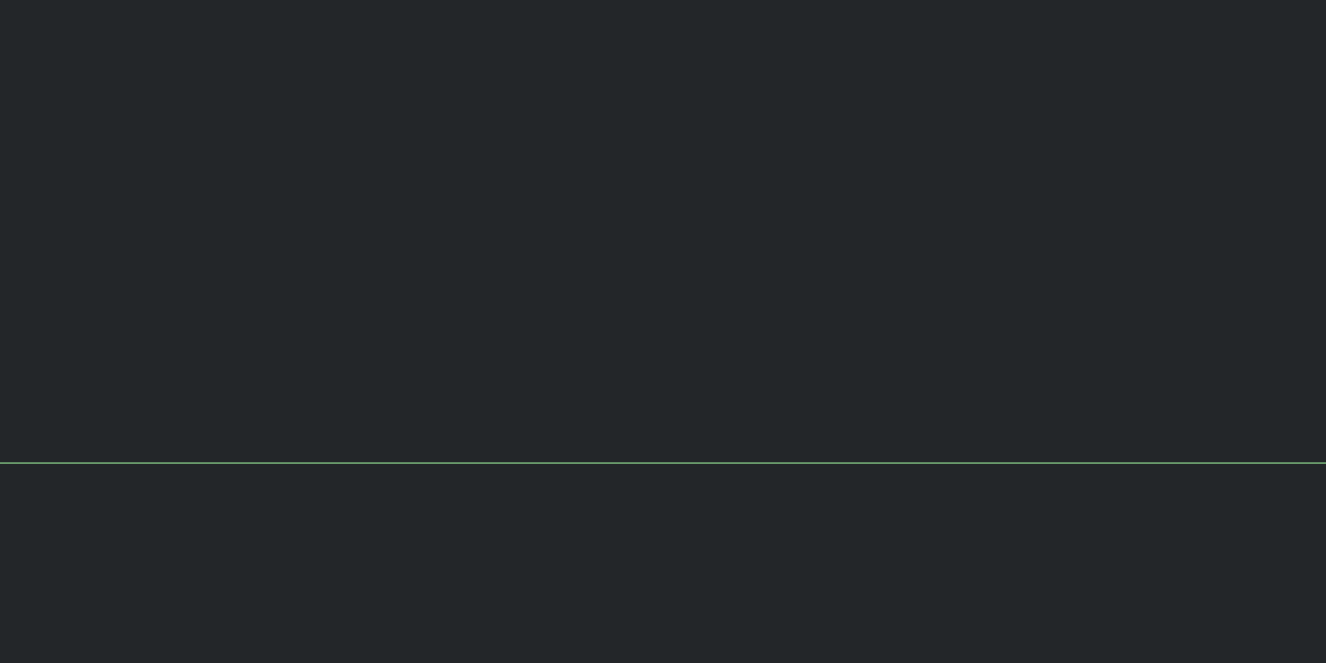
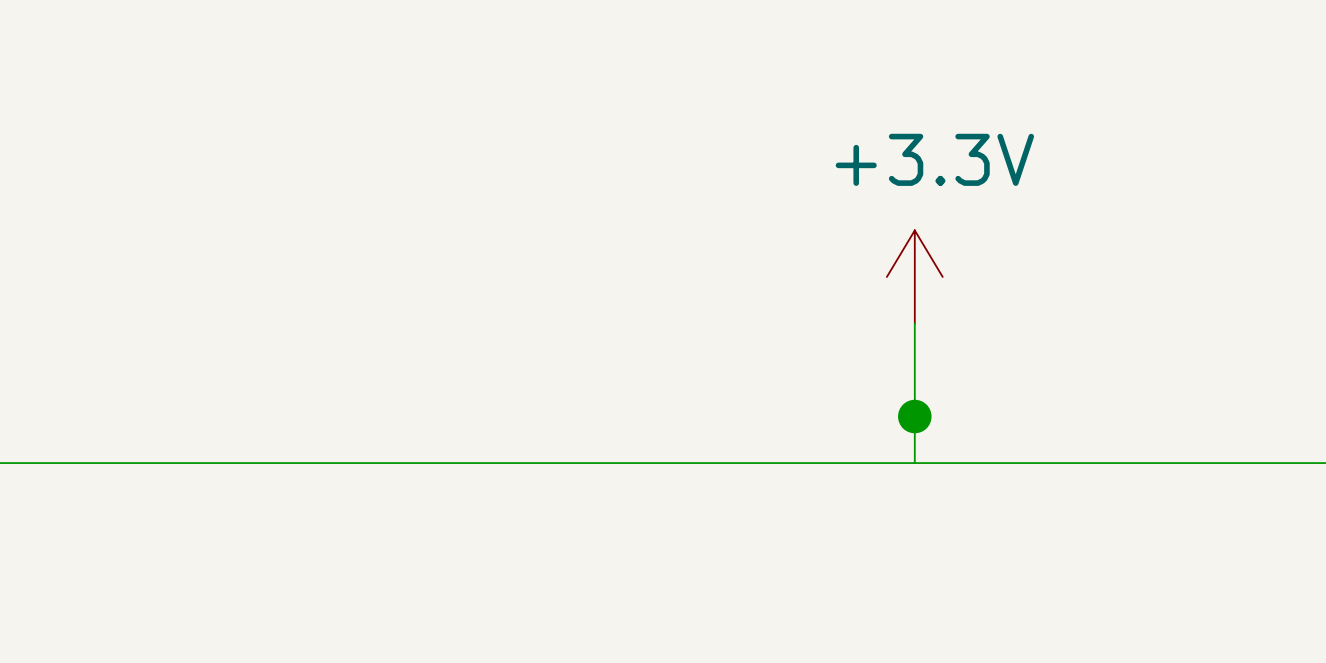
power symbol: none -> +3.3V (914, 276)
wire: none -> (914, 323) (914, 463)
junction: none -> (914, 416)

